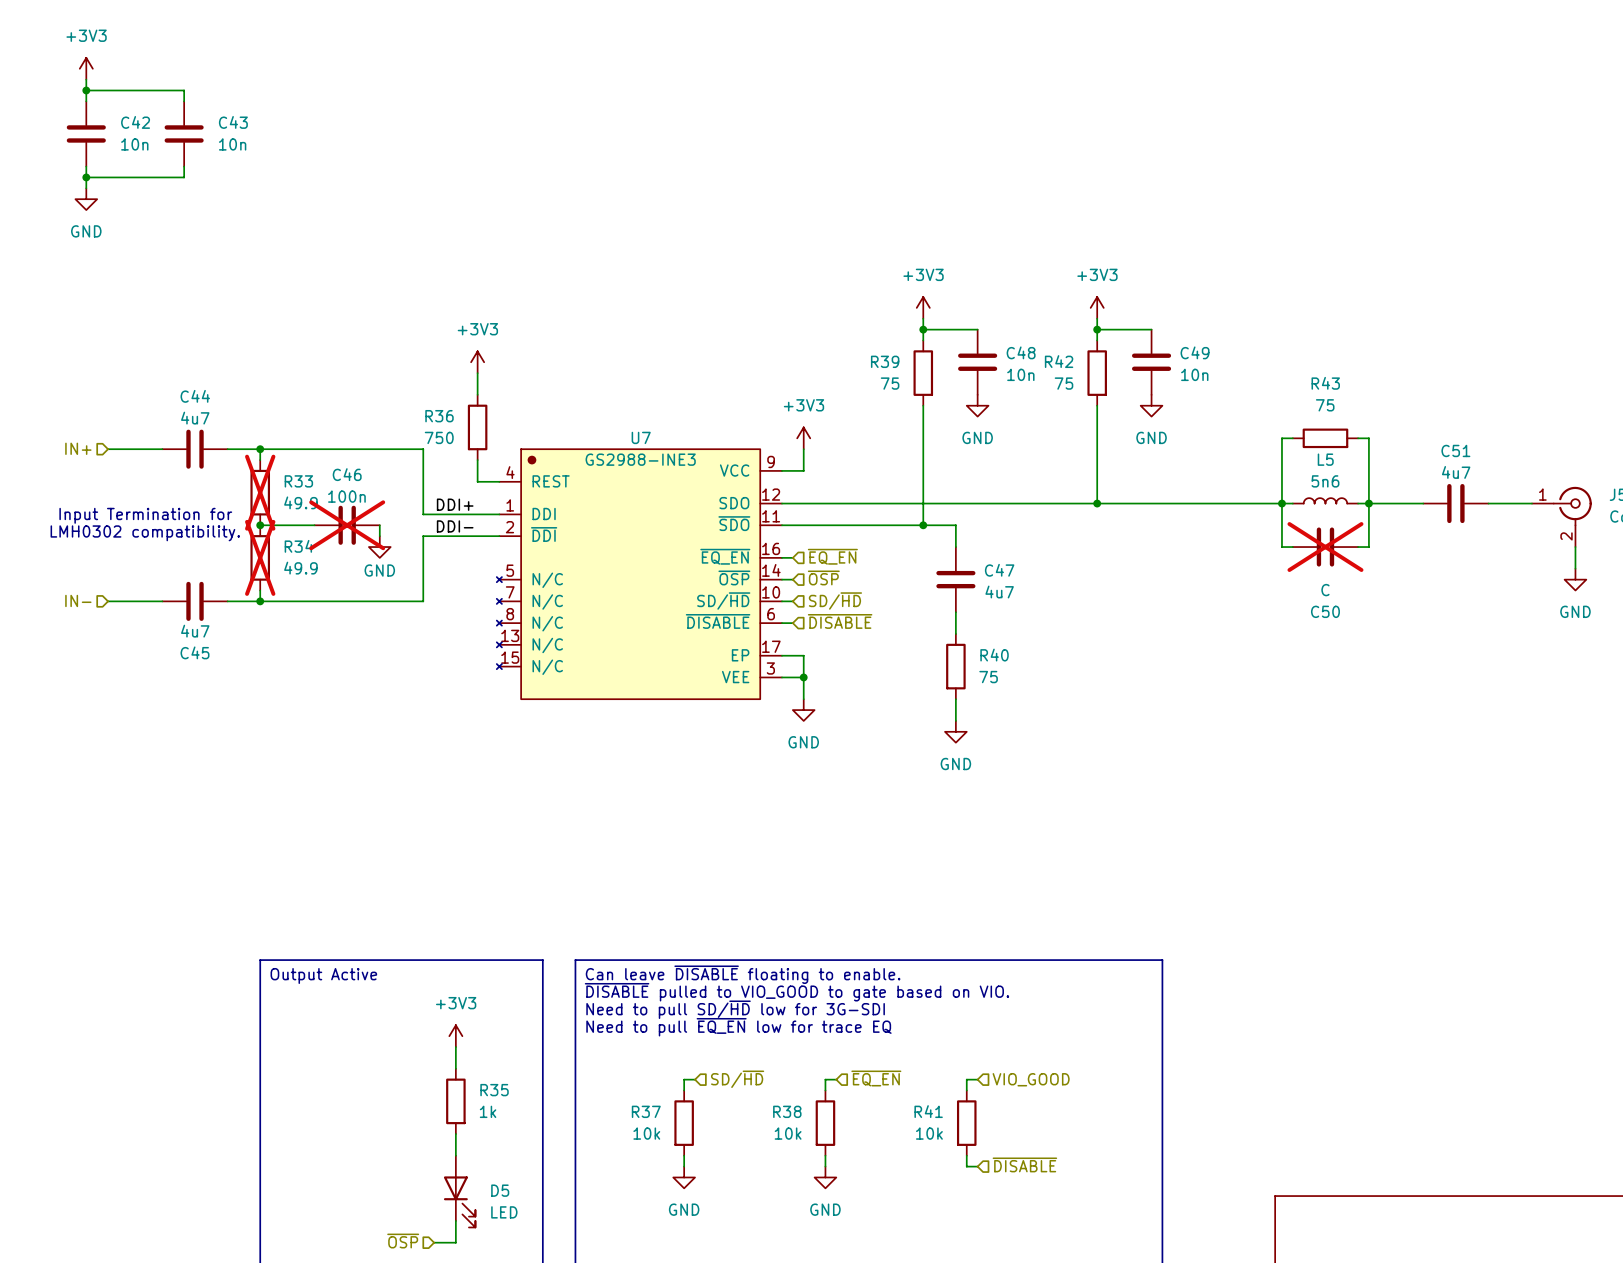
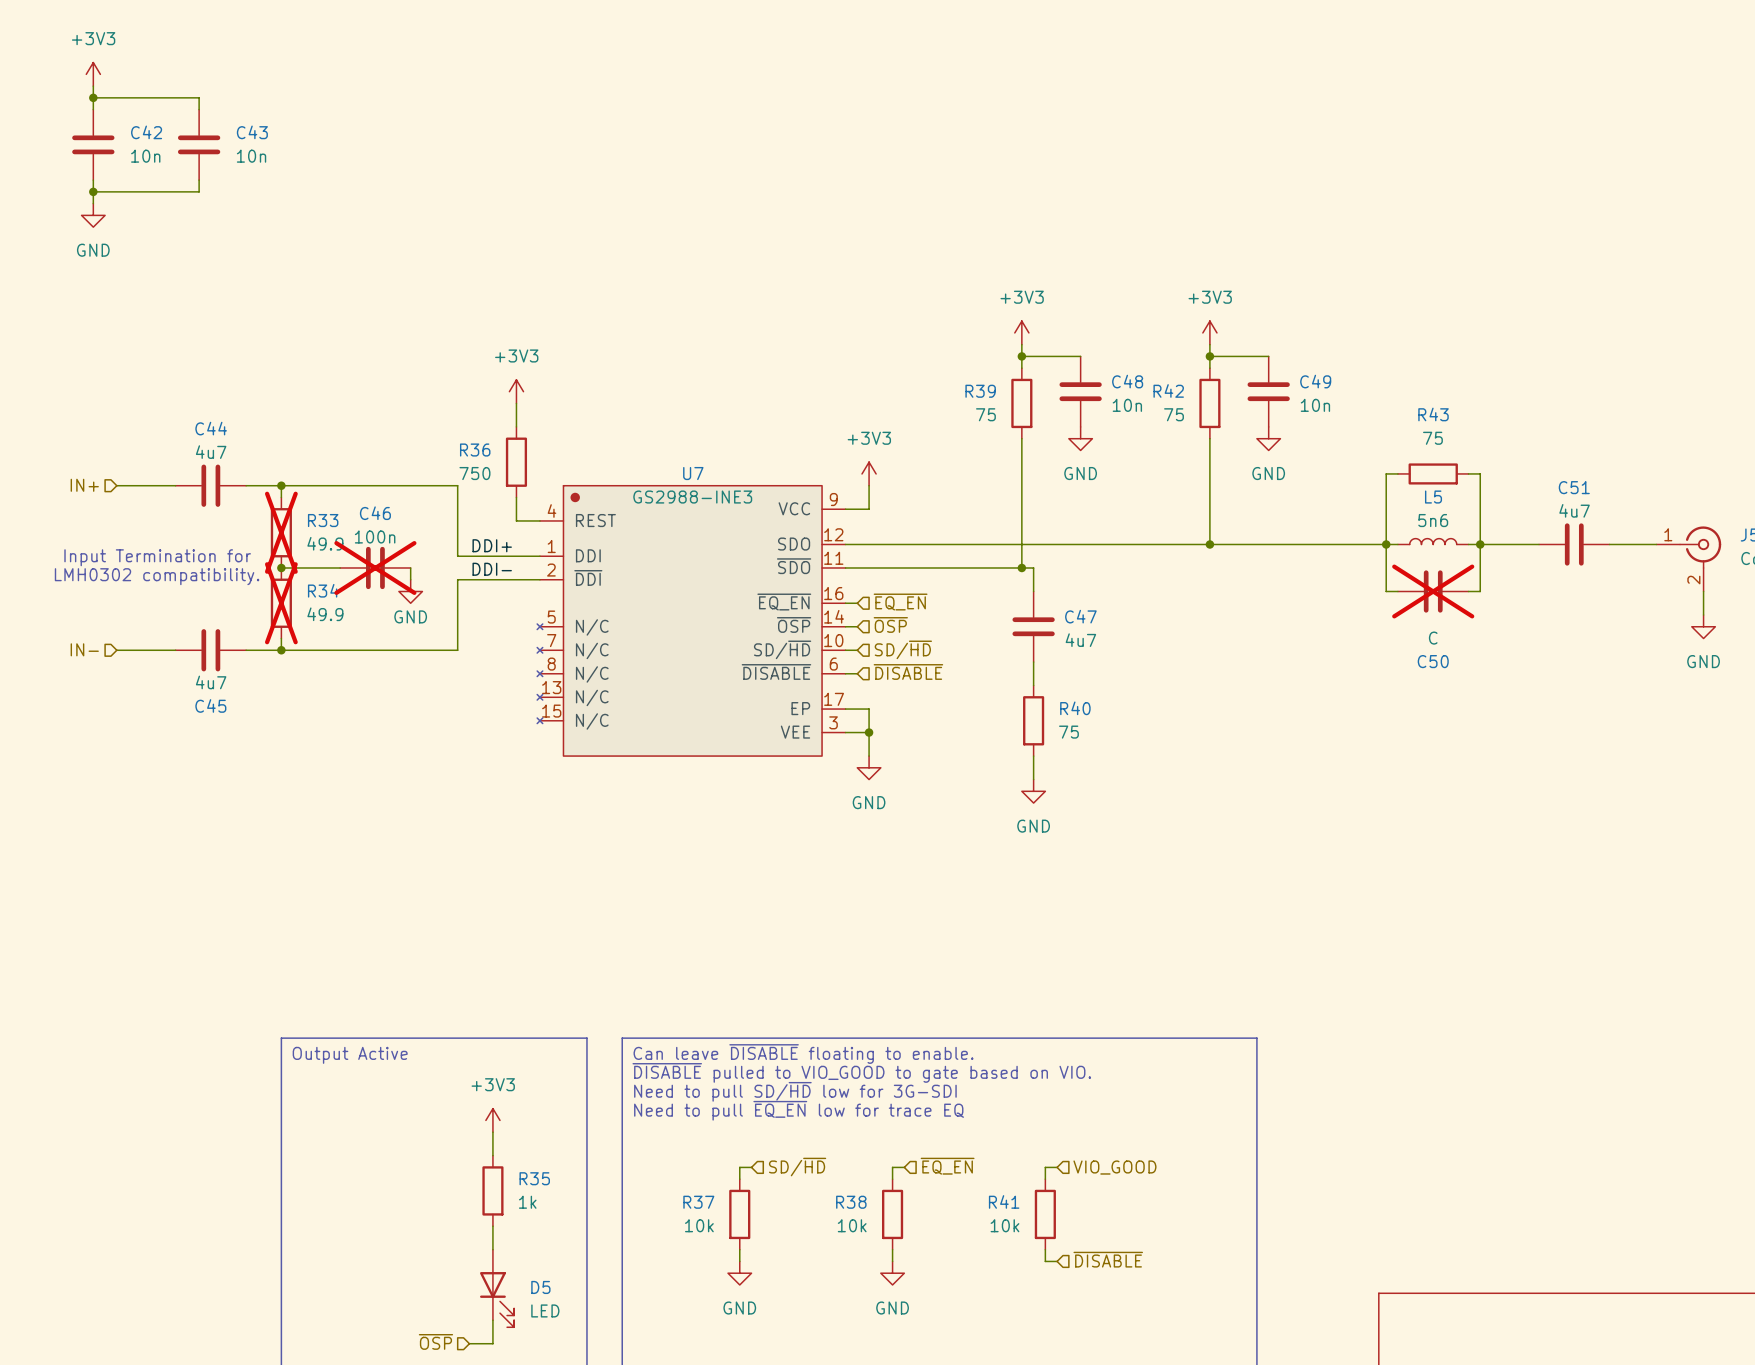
power symbol position: +3V3 (923, 307) -> +3V3 (1021, 332)
power symbol position: +3V3 (1097, 307) -> +3V3 (1209, 332)
wire: (923, 318) (923, 340) -> (1021, 344) (1021, 368)
wire: (1097, 318) (1097, 340) -> (1209, 344) (1209, 368)
wire: (923, 329) (945, 329) -> (1057, 356) (1080, 356)
junction position: (923, 329) -> (1021, 356)
wire: (1097, 329) (1118, 329) -> (1245, 356) (1268, 356)
junction position: (1097, 329) -> (1209, 356)
C48 position: (977, 362) -> (1080, 391)
C49 position: (1151, 362) -> (1268, 391)
R39 position: (923, 373) -> (1021, 403)
R42 position: (1097, 373) -> (1209, 403)
wire: (923, 405) (923, 525) -> (1021, 438) (1021, 567)
power symbol position: GND (977, 405) -> GND (1080, 438)
wire: (1097, 405) (1097, 503) -> (1209, 438) (1209, 544)
power symbol position: GND (1151, 405) -> GND (1268, 438)
junction position: (1097, 503) -> (1209, 544)
junction position: (923, 525) -> (1021, 567)

